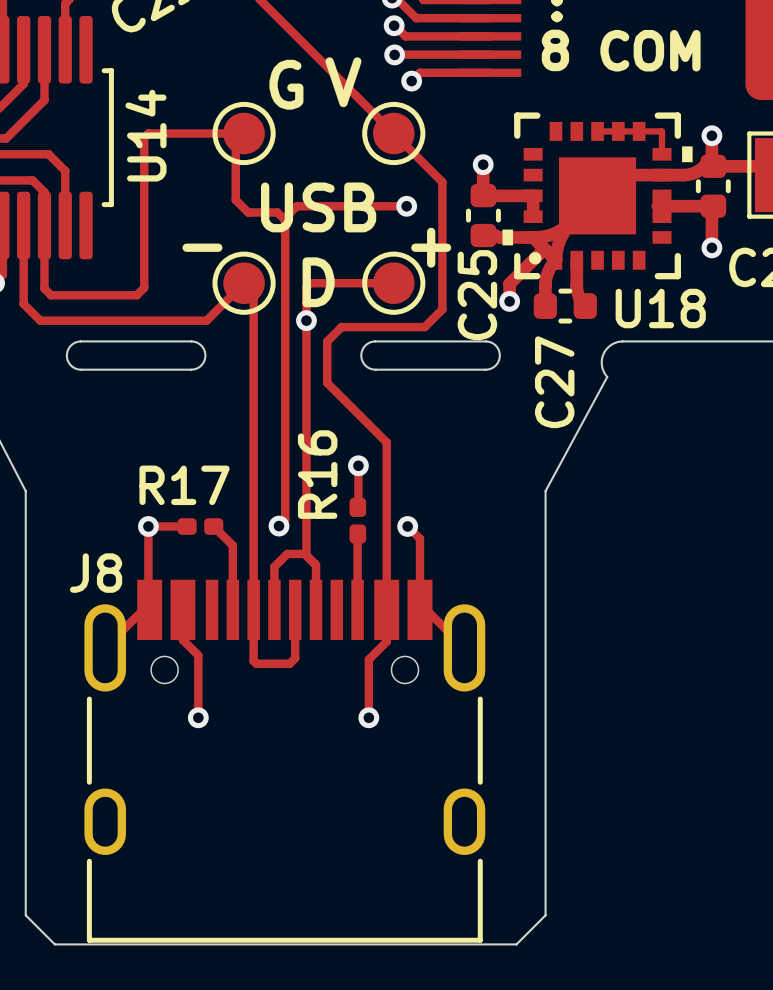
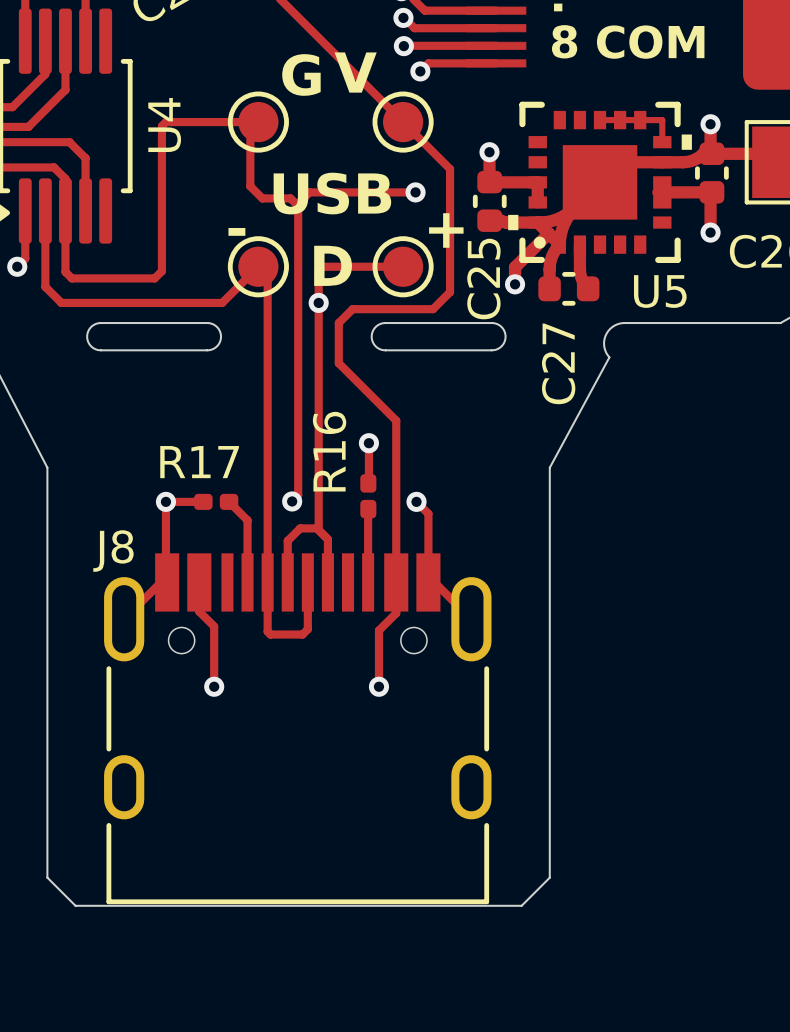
U14 name: U14 (145, 135) -> U4 (164, 125)
U18 name: U18 (660, 308) -> U5 (660, 291)

